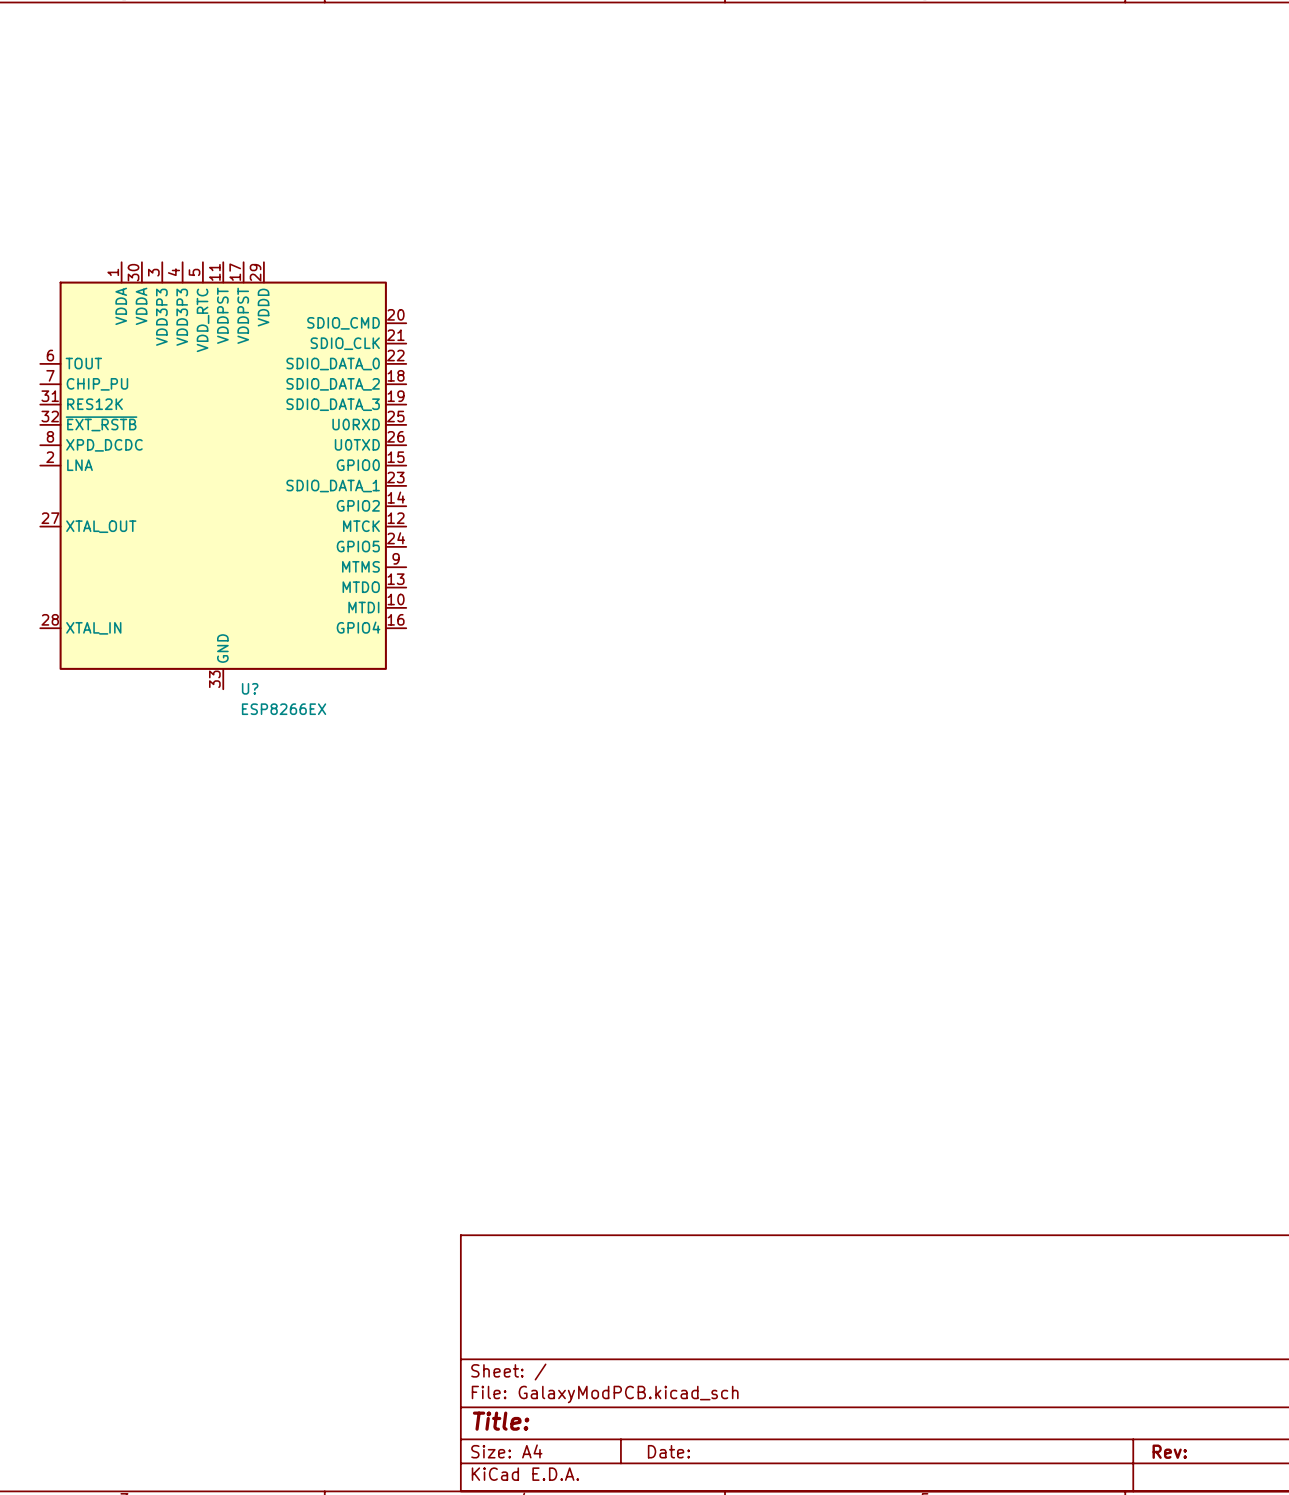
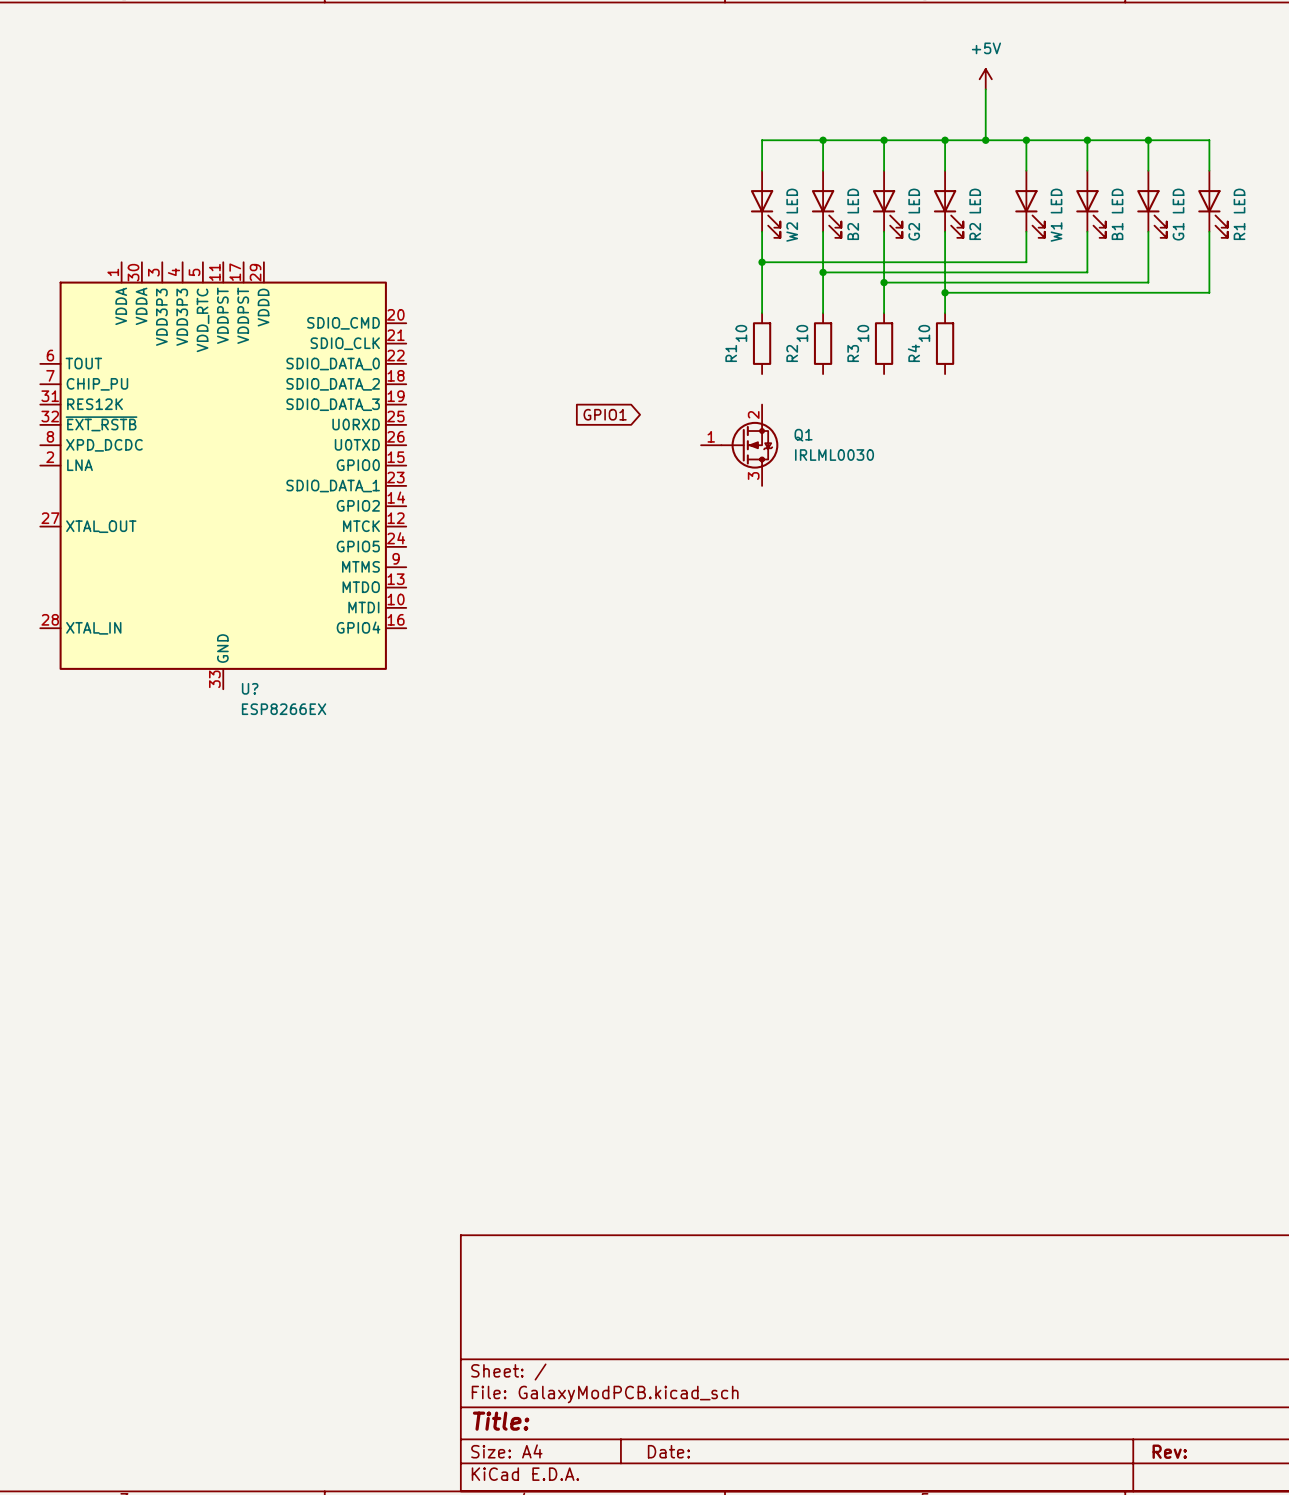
power symbol: none -> +5V (985, 79)
wire: none -> (985, 89) (985, 140)
wire: none -> (823, 140) (823, 170)
junction: none -> (823, 140)
wire: none -> (884, 140) (884, 170)
junction: none -> (884, 140)
wire: none -> (945, 140) (945, 170)
junction: none -> (945, 140)
junction: none -> (985, 140)
wire: none -> (1026, 140) (1026, 170)
junction: none -> (1026, 140)
wire: none -> (1087, 140) (1087, 170)
junction: none -> (1087, 140)
wire: none -> (1148, 140) (1148, 170)
junction: none -> (1148, 140)
wire: none -> (762, 170) (762, 140) (1209, 140) (1209, 170)
W2: none -> LED (765, 204)
B2: none -> LED (826, 204)
G2: none -> LED (887, 204)
R2: none -> LED (948, 204)
W1: none -> LED (1029, 204)
B1: none -> LED (1090, 204)
G1: none -> LED (1151, 204)
R1: none -> LED (1212, 204)
wire: none -> (762, 231) (762, 313)
wire: none -> (823, 231) (823, 313)
wire: none -> (884, 231) (884, 313)
wire: none -> (945, 231) (945, 313)
wire: none -> (1026, 231) (1026, 262) (762, 262)
wire: none -> (1087, 231) (1087, 272) (823, 272)
wire: none -> (1148, 231) (1148, 282) (884, 282)
wire: none -> (1209, 231) (1209, 292) (945, 292)
junction: none -> (762, 262)
junction: none -> (823, 272)
junction: none -> (884, 282)
junction: none -> (945, 292)
R1: none -> 10 (762, 343)
R2: none -> 10 (823, 343)
R3: none -> 10 (884, 343)
R4: none -> 10 (945, 343)
global label: none -> GPIO1 (605, 414)
Q1: none -> IRLML0030 (739, 445)

